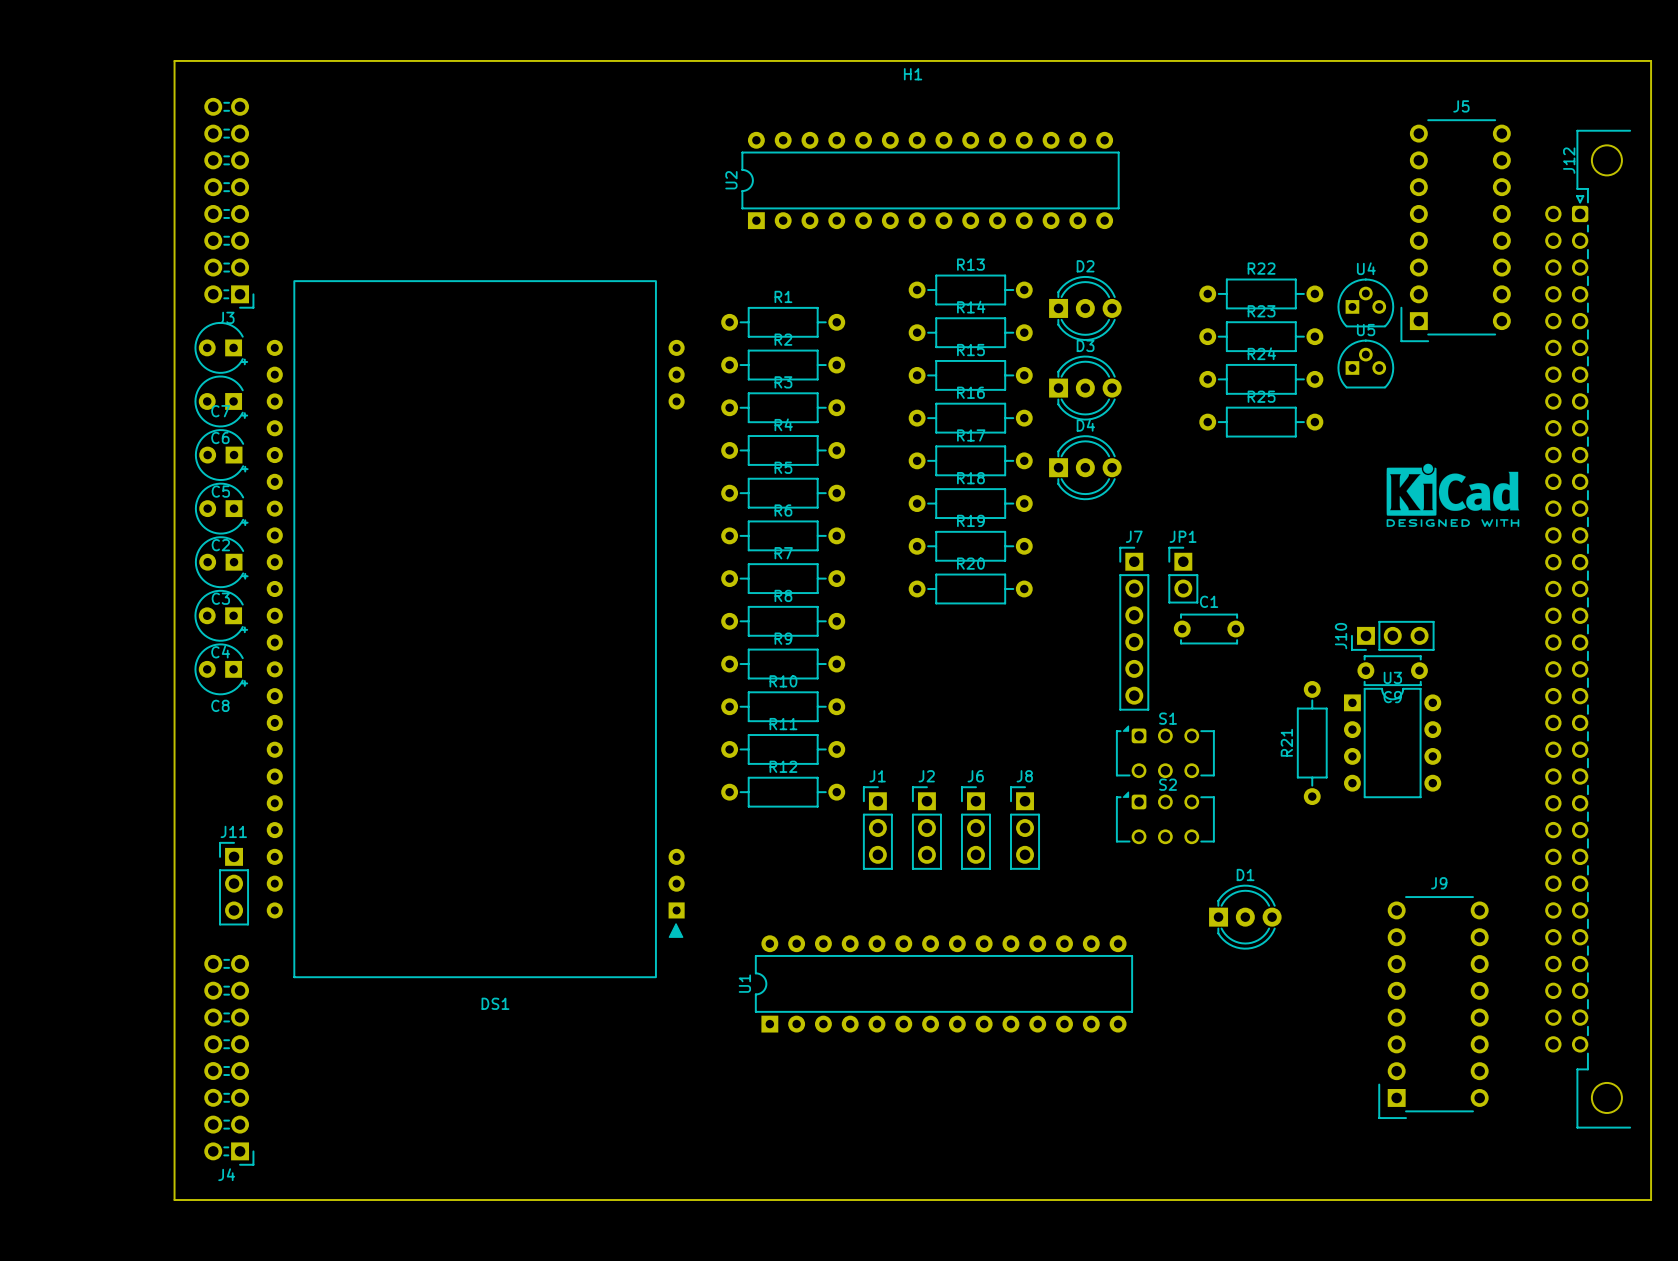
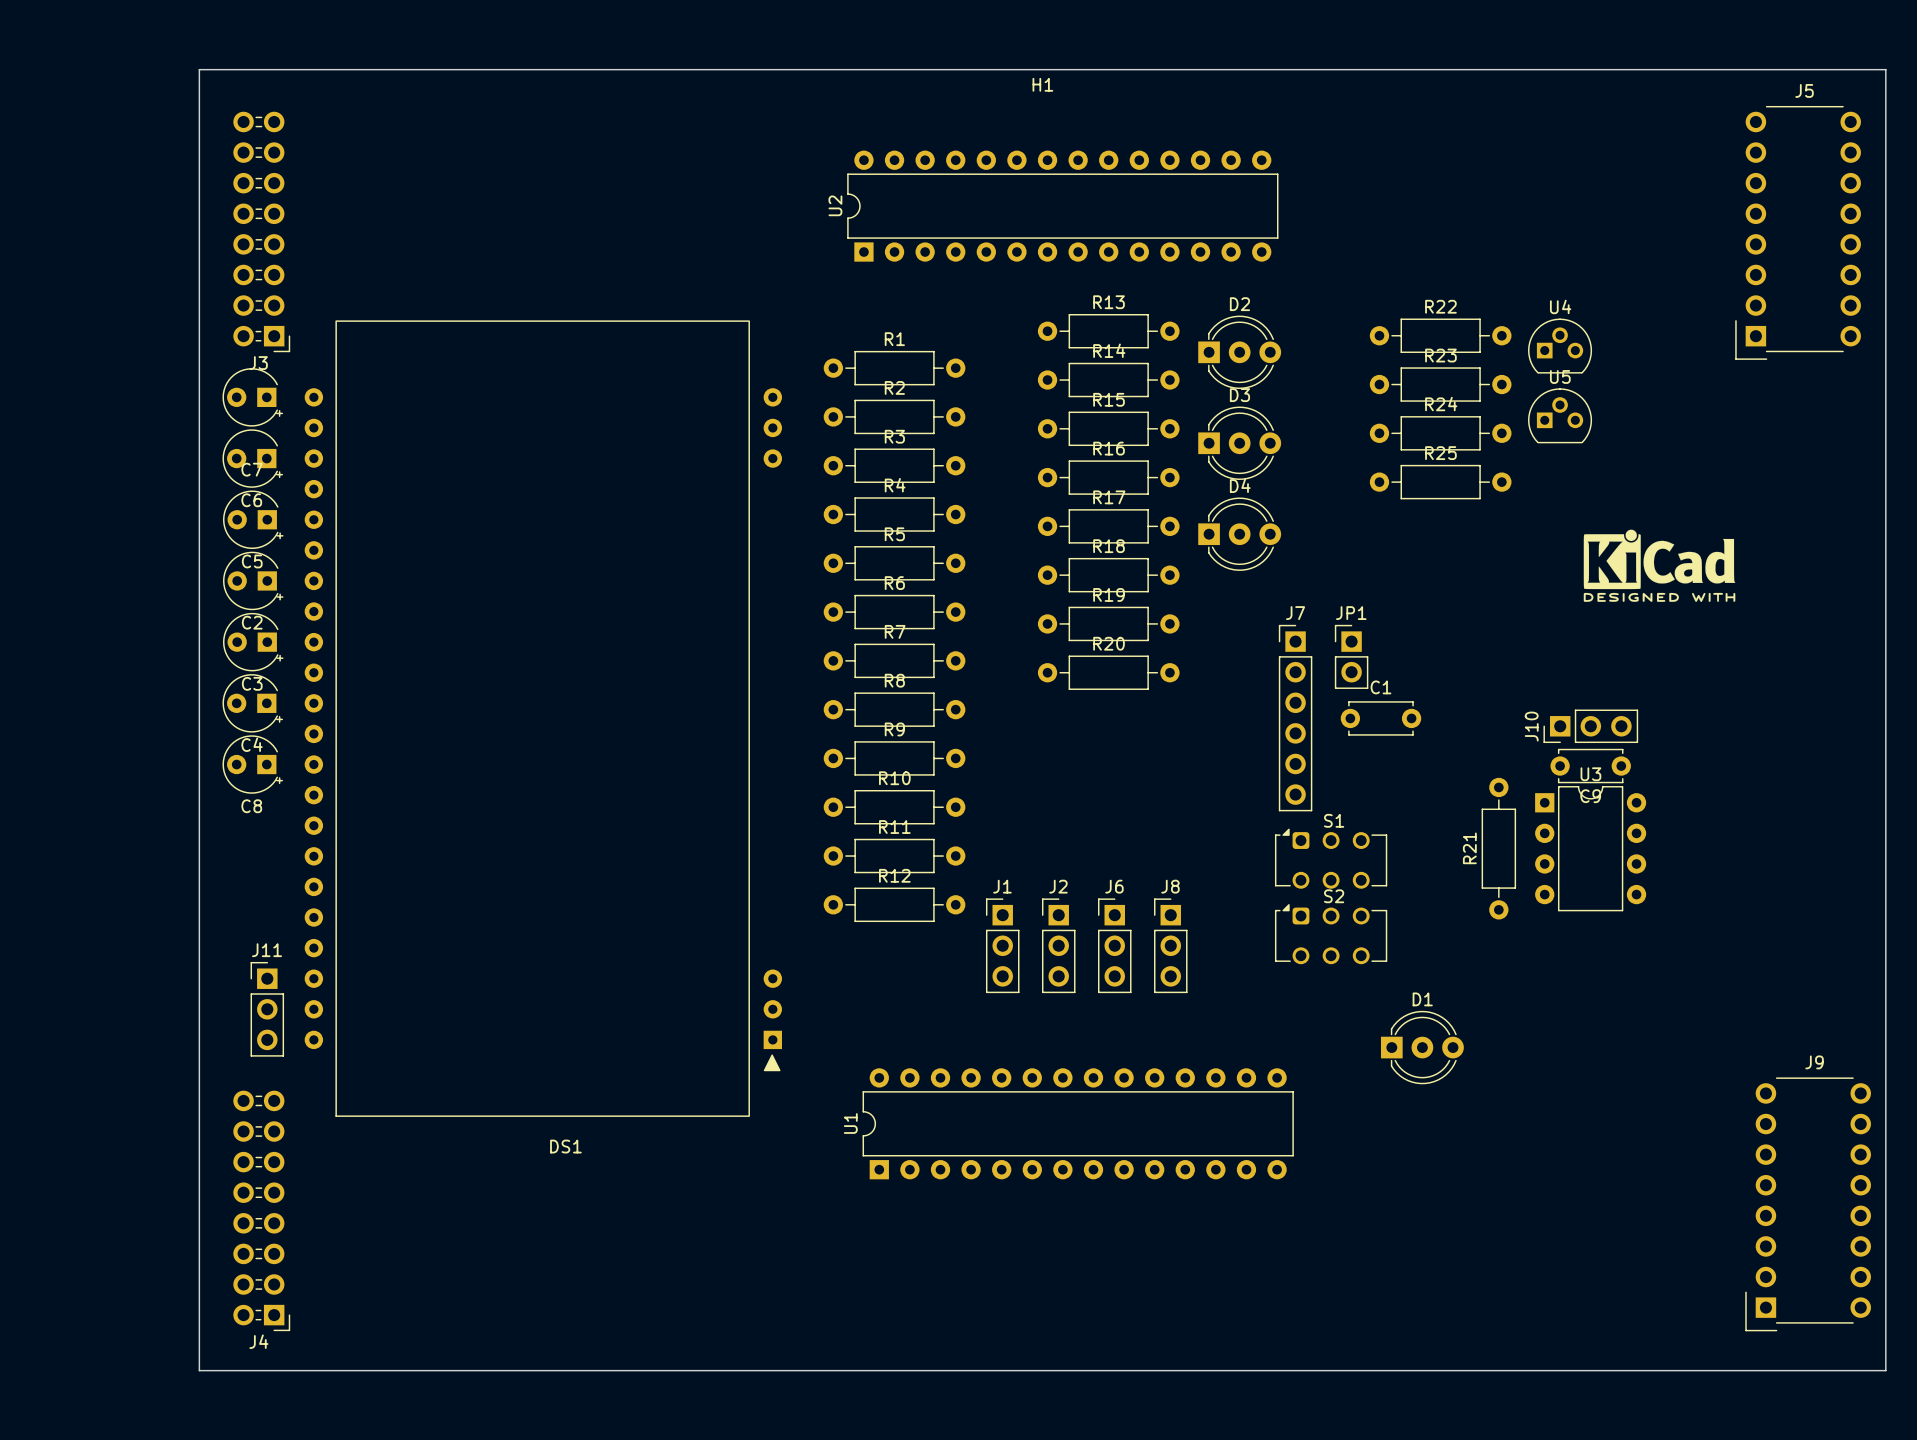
J5 position: (1455, 230) -> (1798, 232)
J12: (1587, 629) -> none
J9 position: (1433, 1007) -> (1808, 1204)

